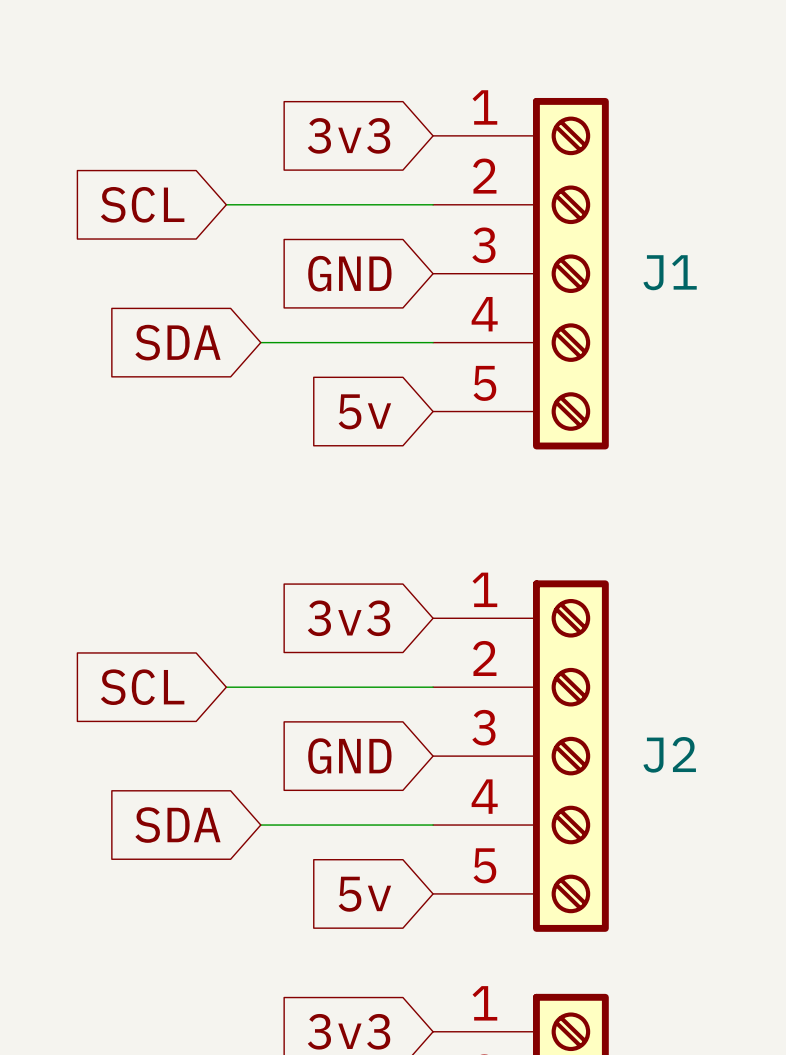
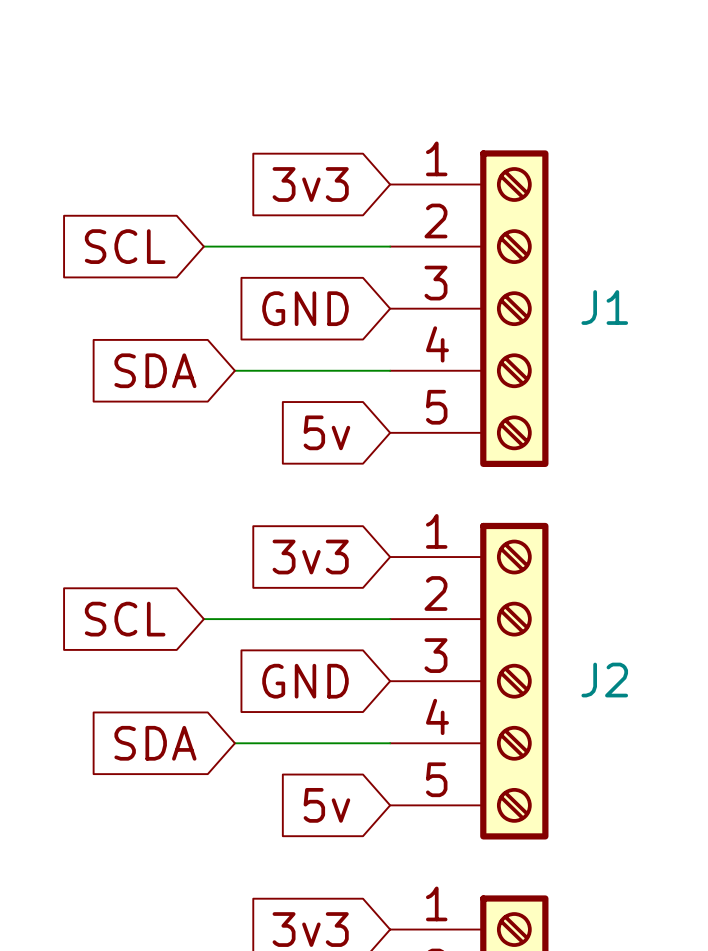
global label position: 3v3 (349, 135) -> 3v3 (310, 184)
global label position: SCL (142, 204) -> SCL (125, 246)
wire: (226, 204) (433, 204) -> (203, 246) (390, 246)
global label position: GND (349, 273) -> GND (305, 308)
J1 position: (520, 273) -> (469, 308)
global label position: SDA (177, 342) -> SDA (155, 370)
wire: (260, 342) (433, 342) -> (234, 370) (390, 370)
global label position: 5v (364, 411) -> 5v (326, 432)

